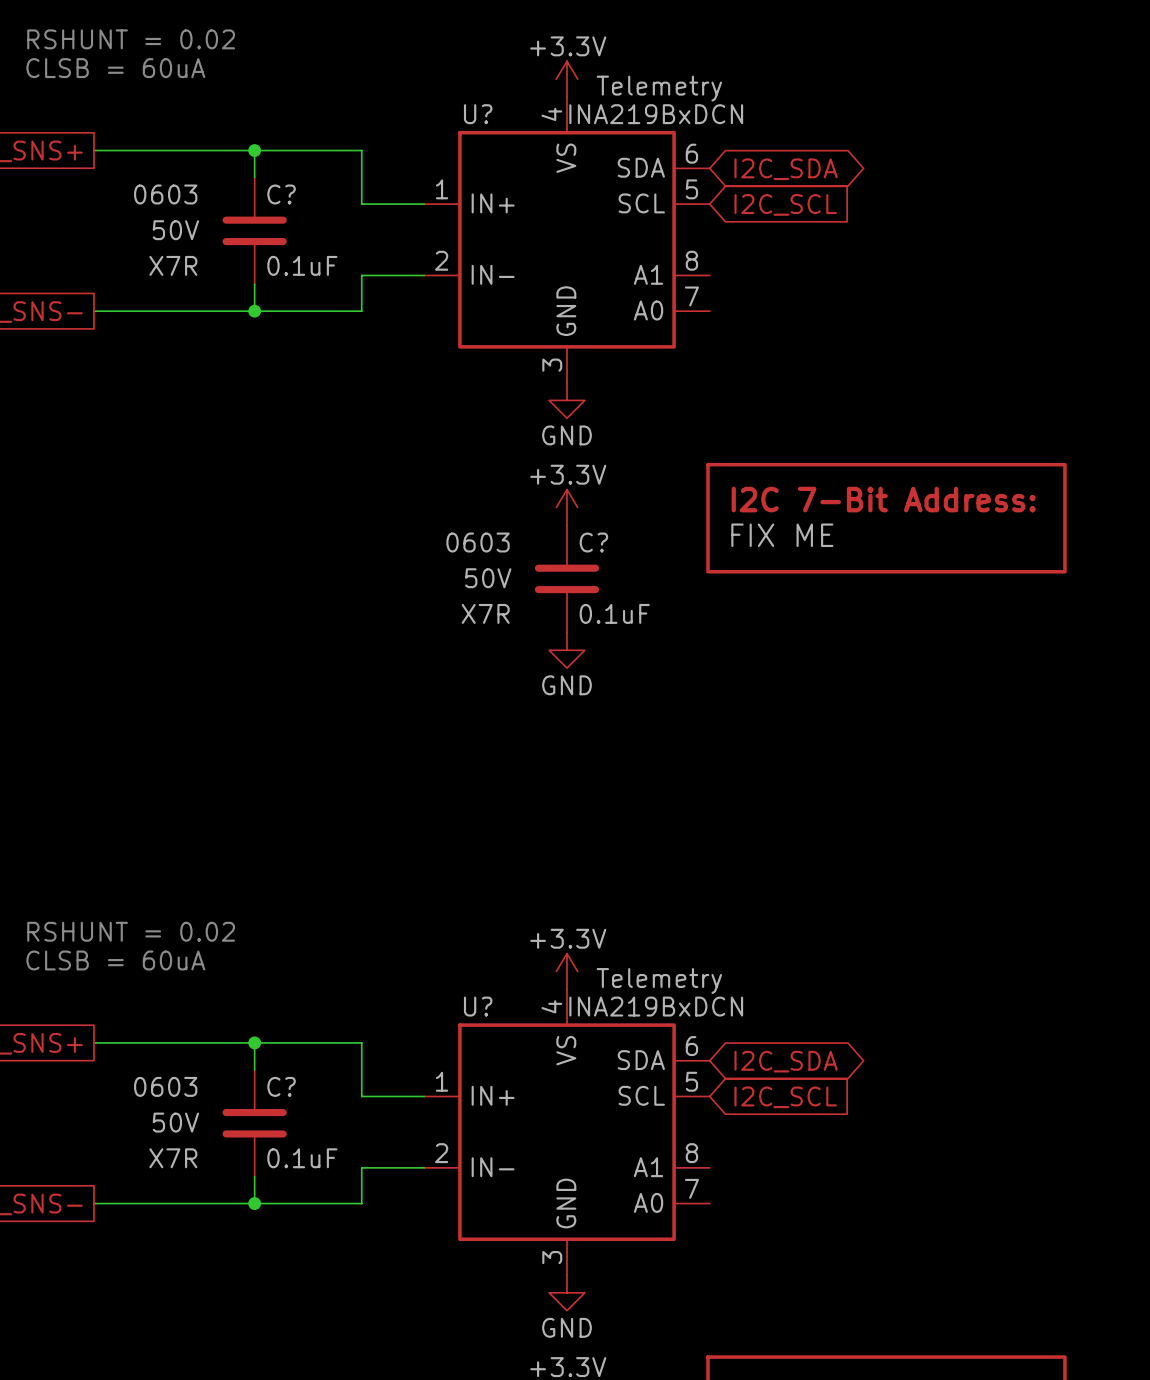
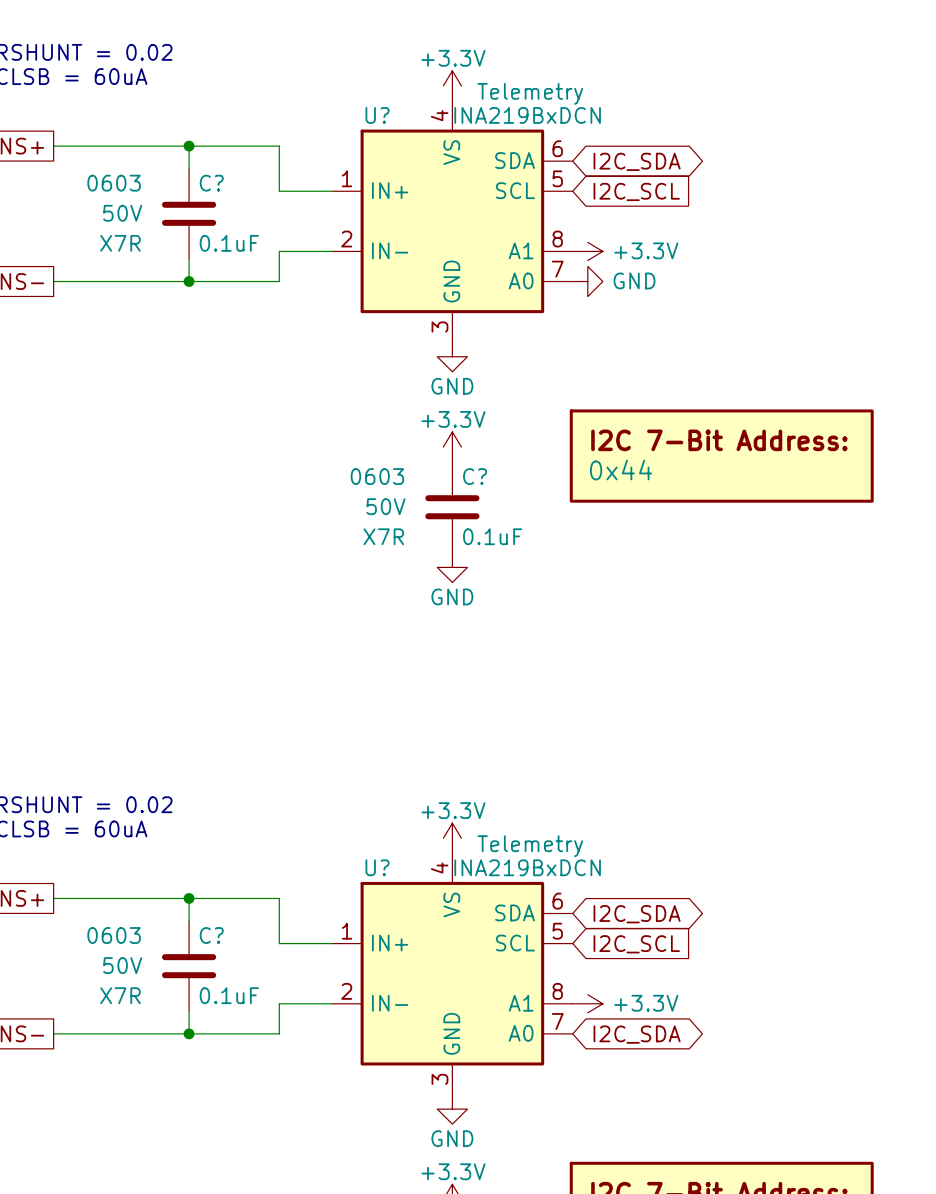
power symbol: none -> +3.3V (587, 251)
power symbol: none -> GND (587, 281)
part value: FIX ME (782, 535) -> 0x44 (621, 470)
power symbol: none -> +3.3V (587, 1003)
global label: none -> I2C_SDA (637, 1034)

